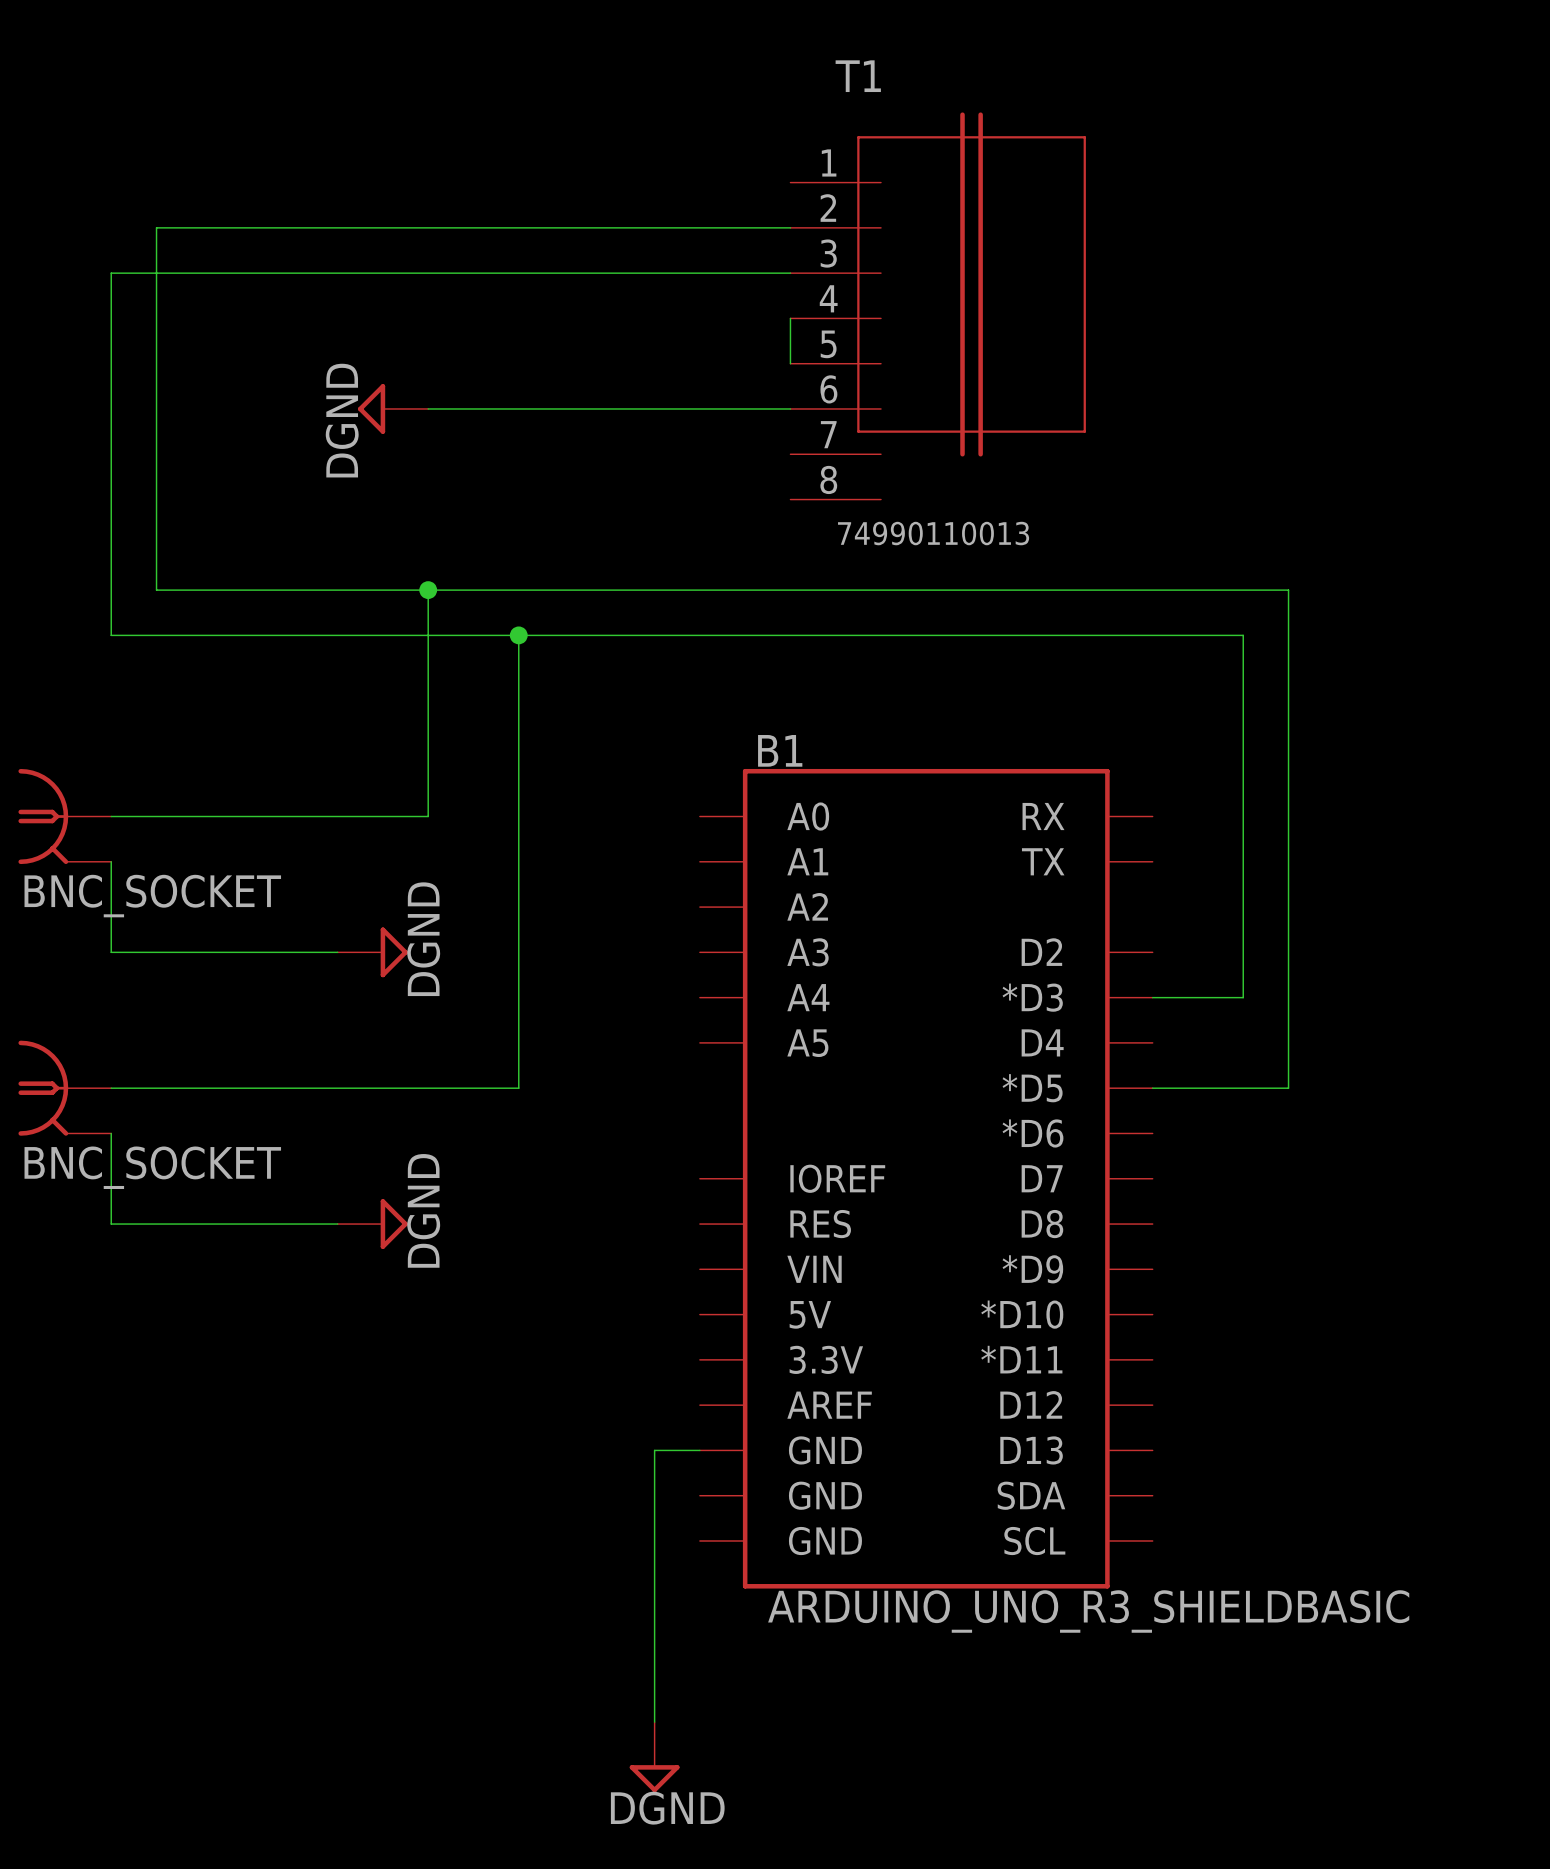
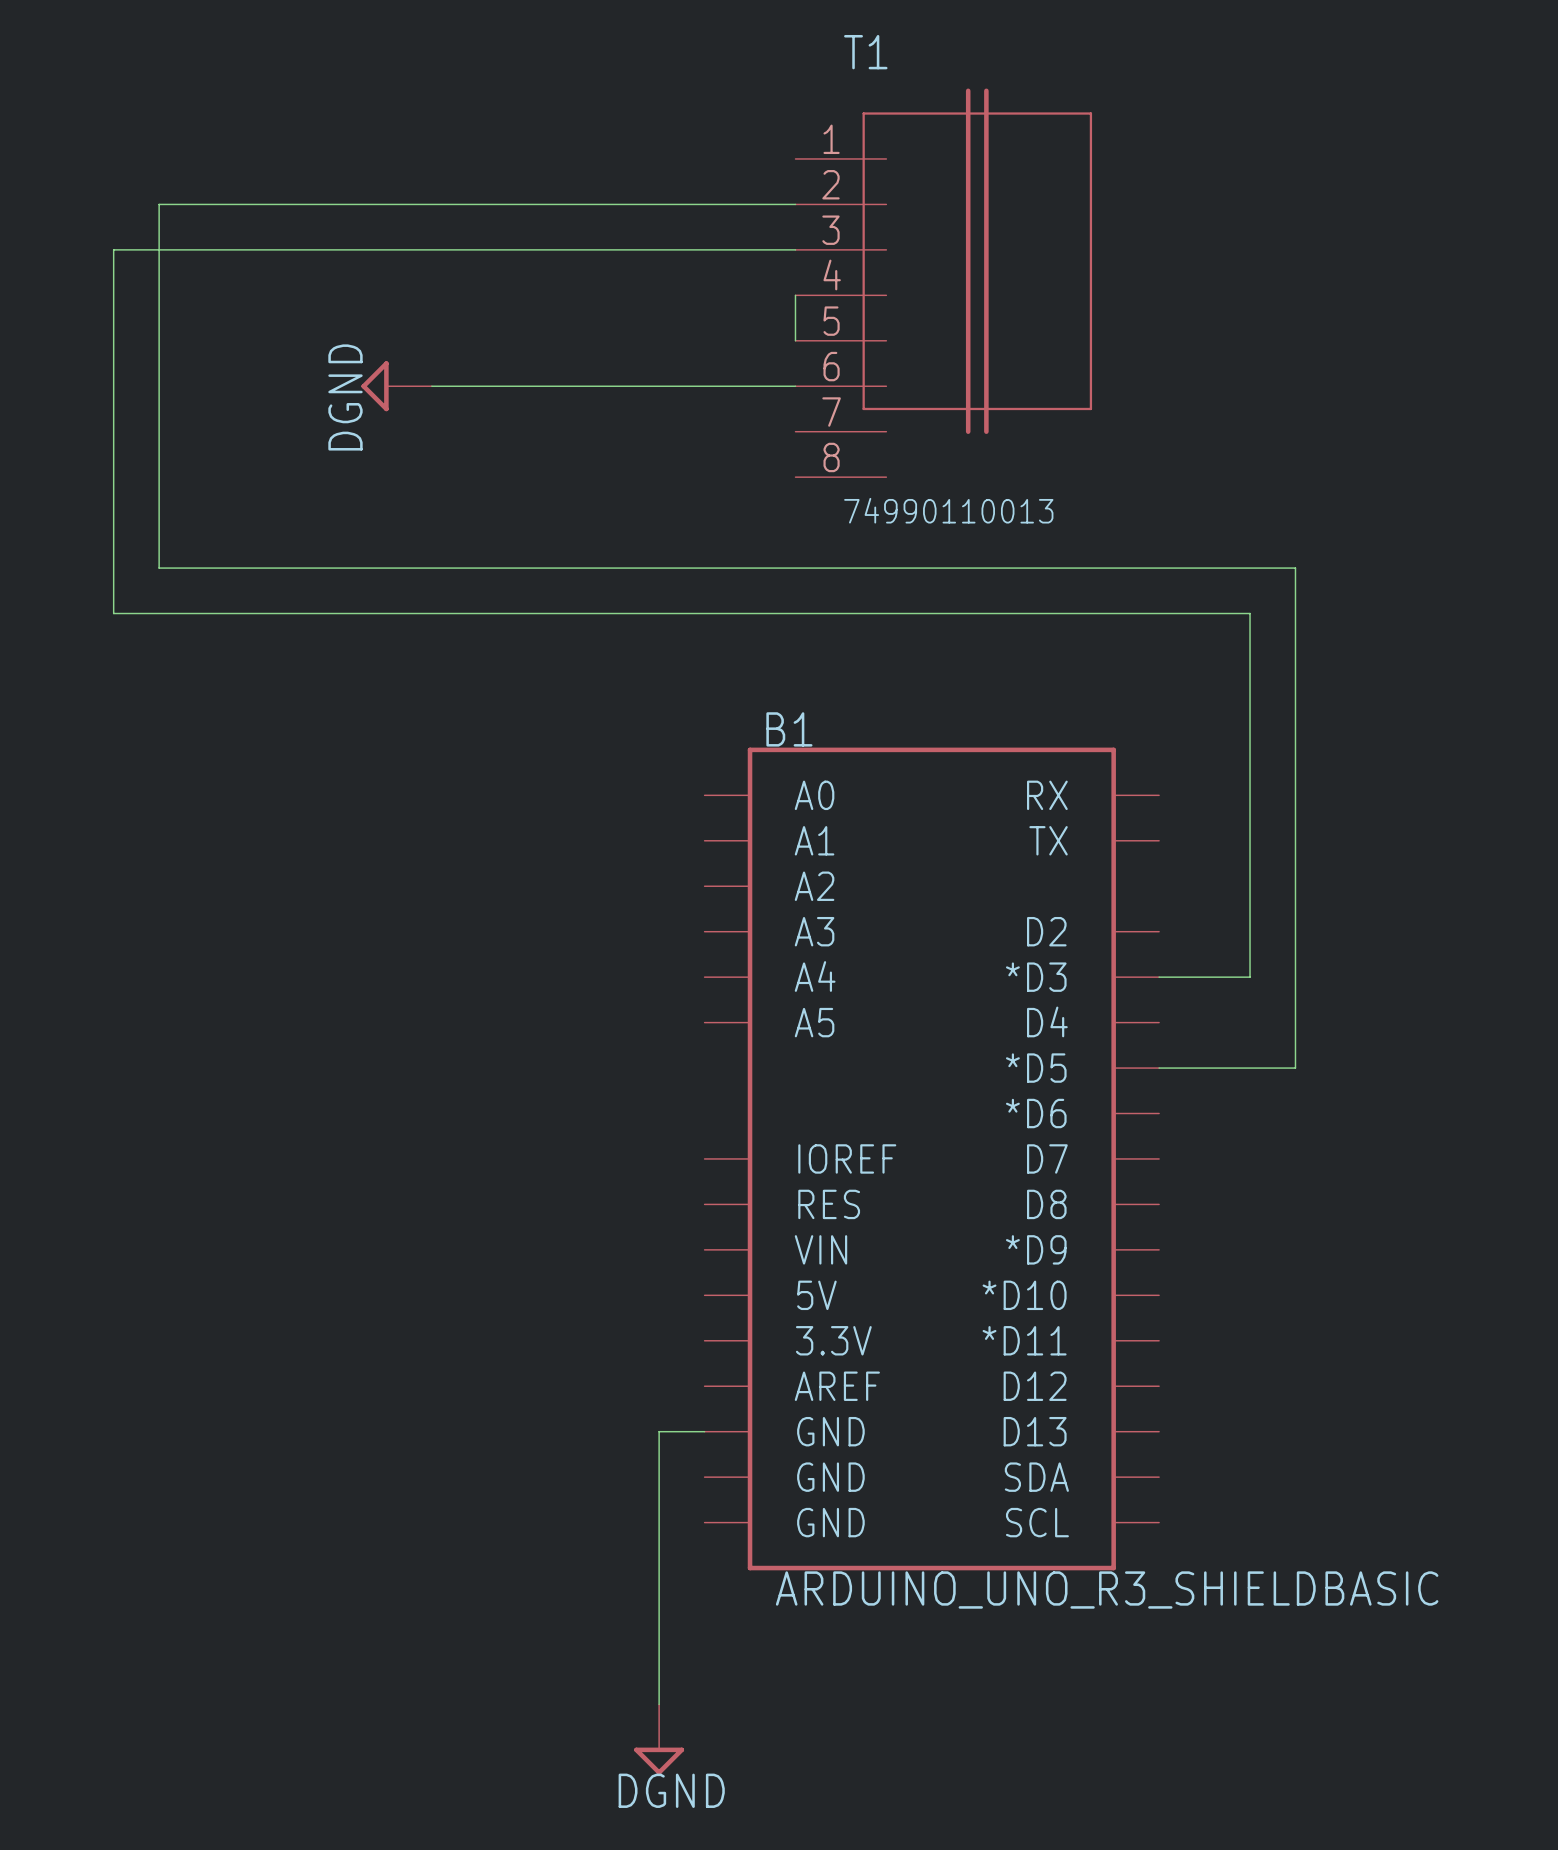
wire: (428, 590) (428, 816) (111, 816) -> none
junction: (428, 590) -> none
wire: (518, 635) (518, 1088) (111, 1088) -> none
junction: (518, 635) -> none
part: BNC_SOCKET (64, 816) -> none
wire: (111, 861) (111, 952) (337, 952) -> none
power symbol: DGND (372, 952) -> none
part: BNC_SOCKET (64, 1088) -> none
wire: (111, 1133) (111, 1224) (337, 1224) -> none
power symbol: DGND (372, 1224) -> none

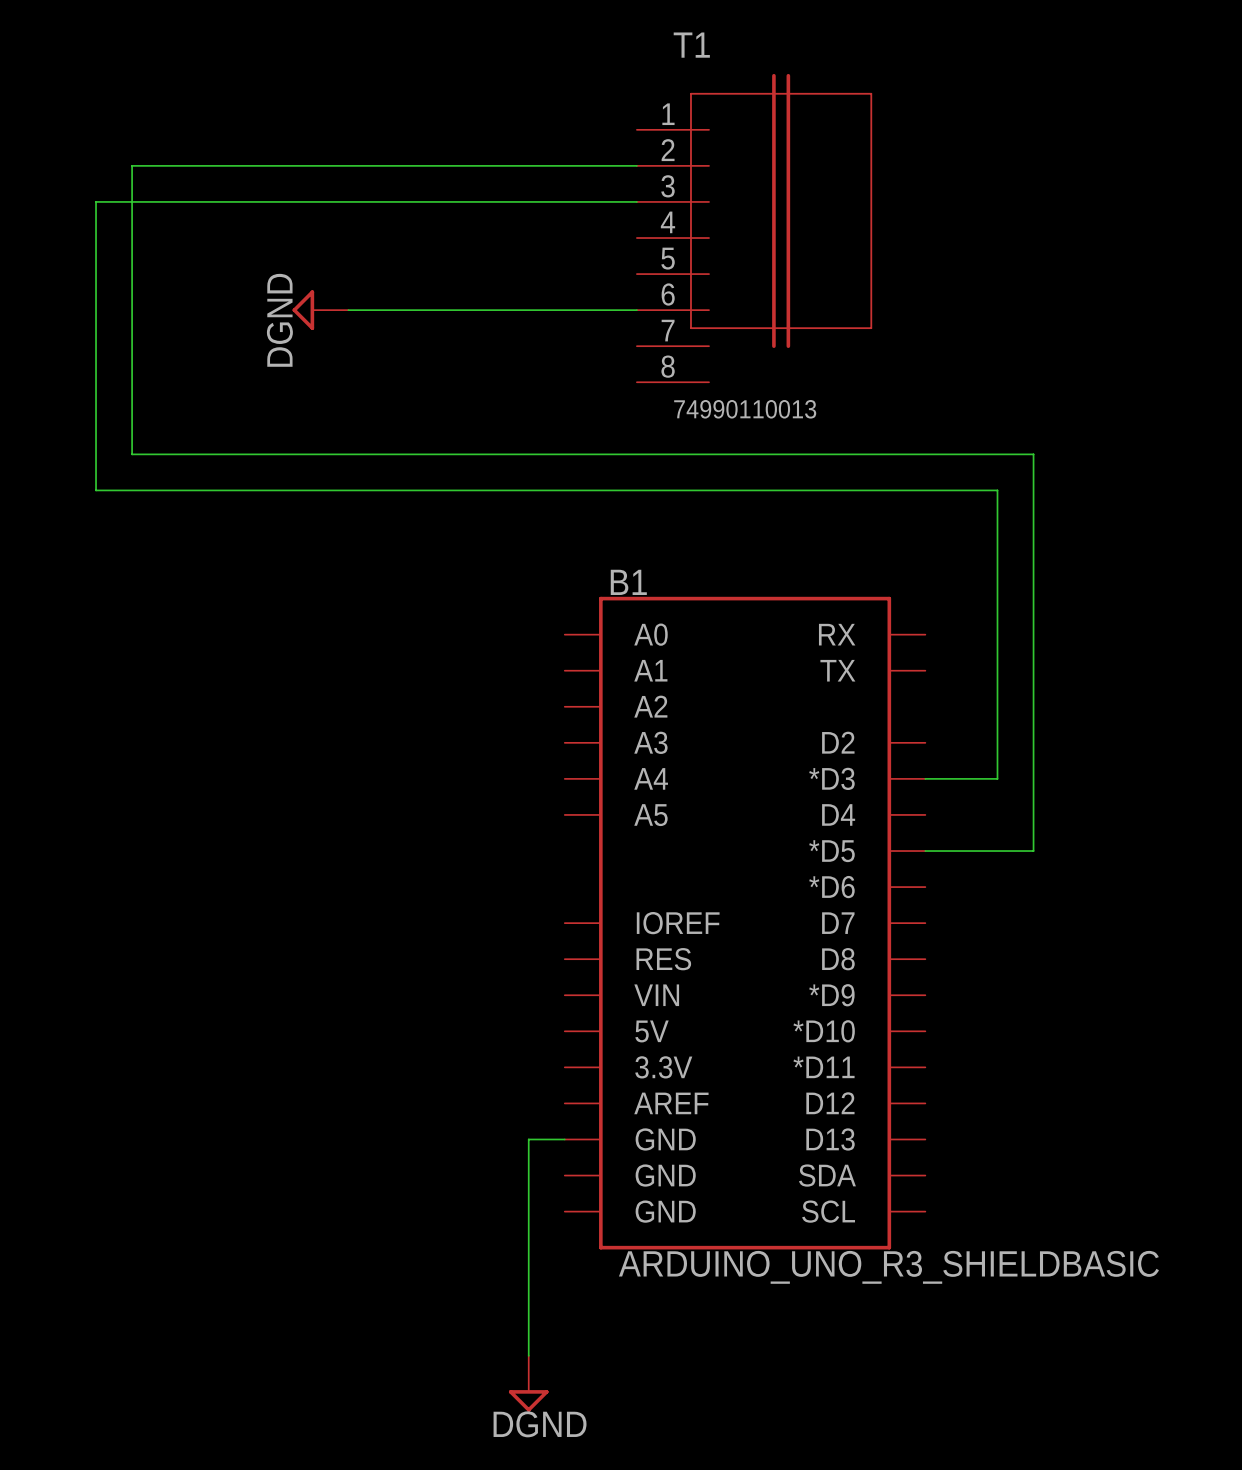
wire: (795, 295) (795, 340) -> none

